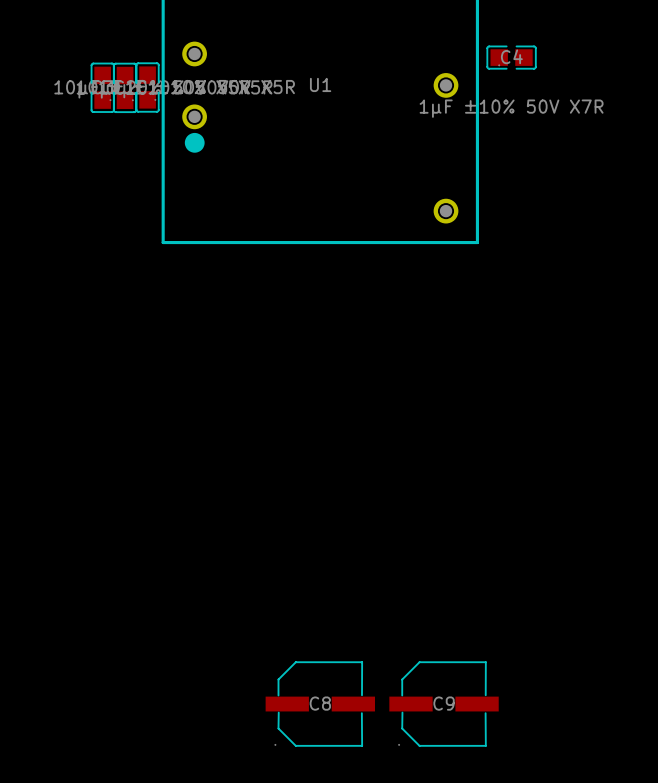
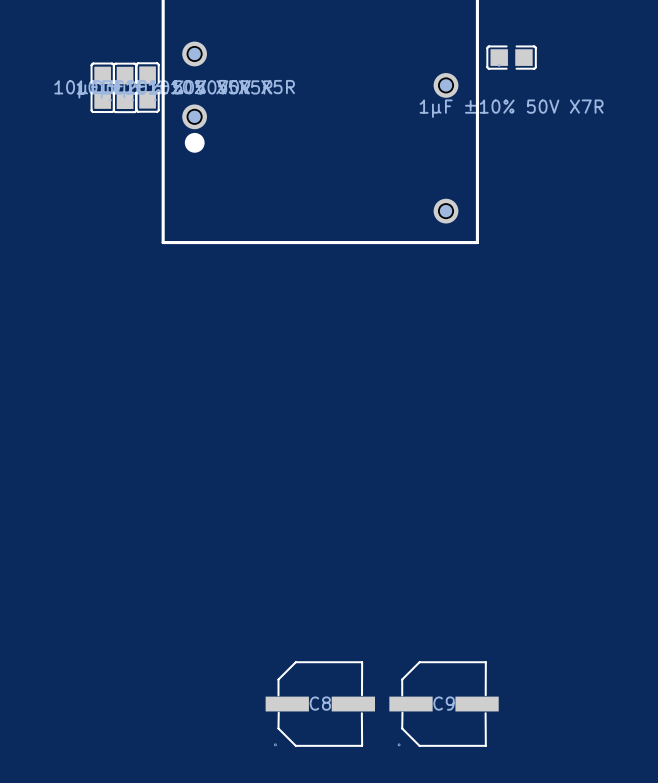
C4: 1µF ±10% 50V X7R (511, 57) -> none
part: none -> 1µF ±10% 50V X7R (511, 57)
U1 name: U1 (320, 84) -> none

